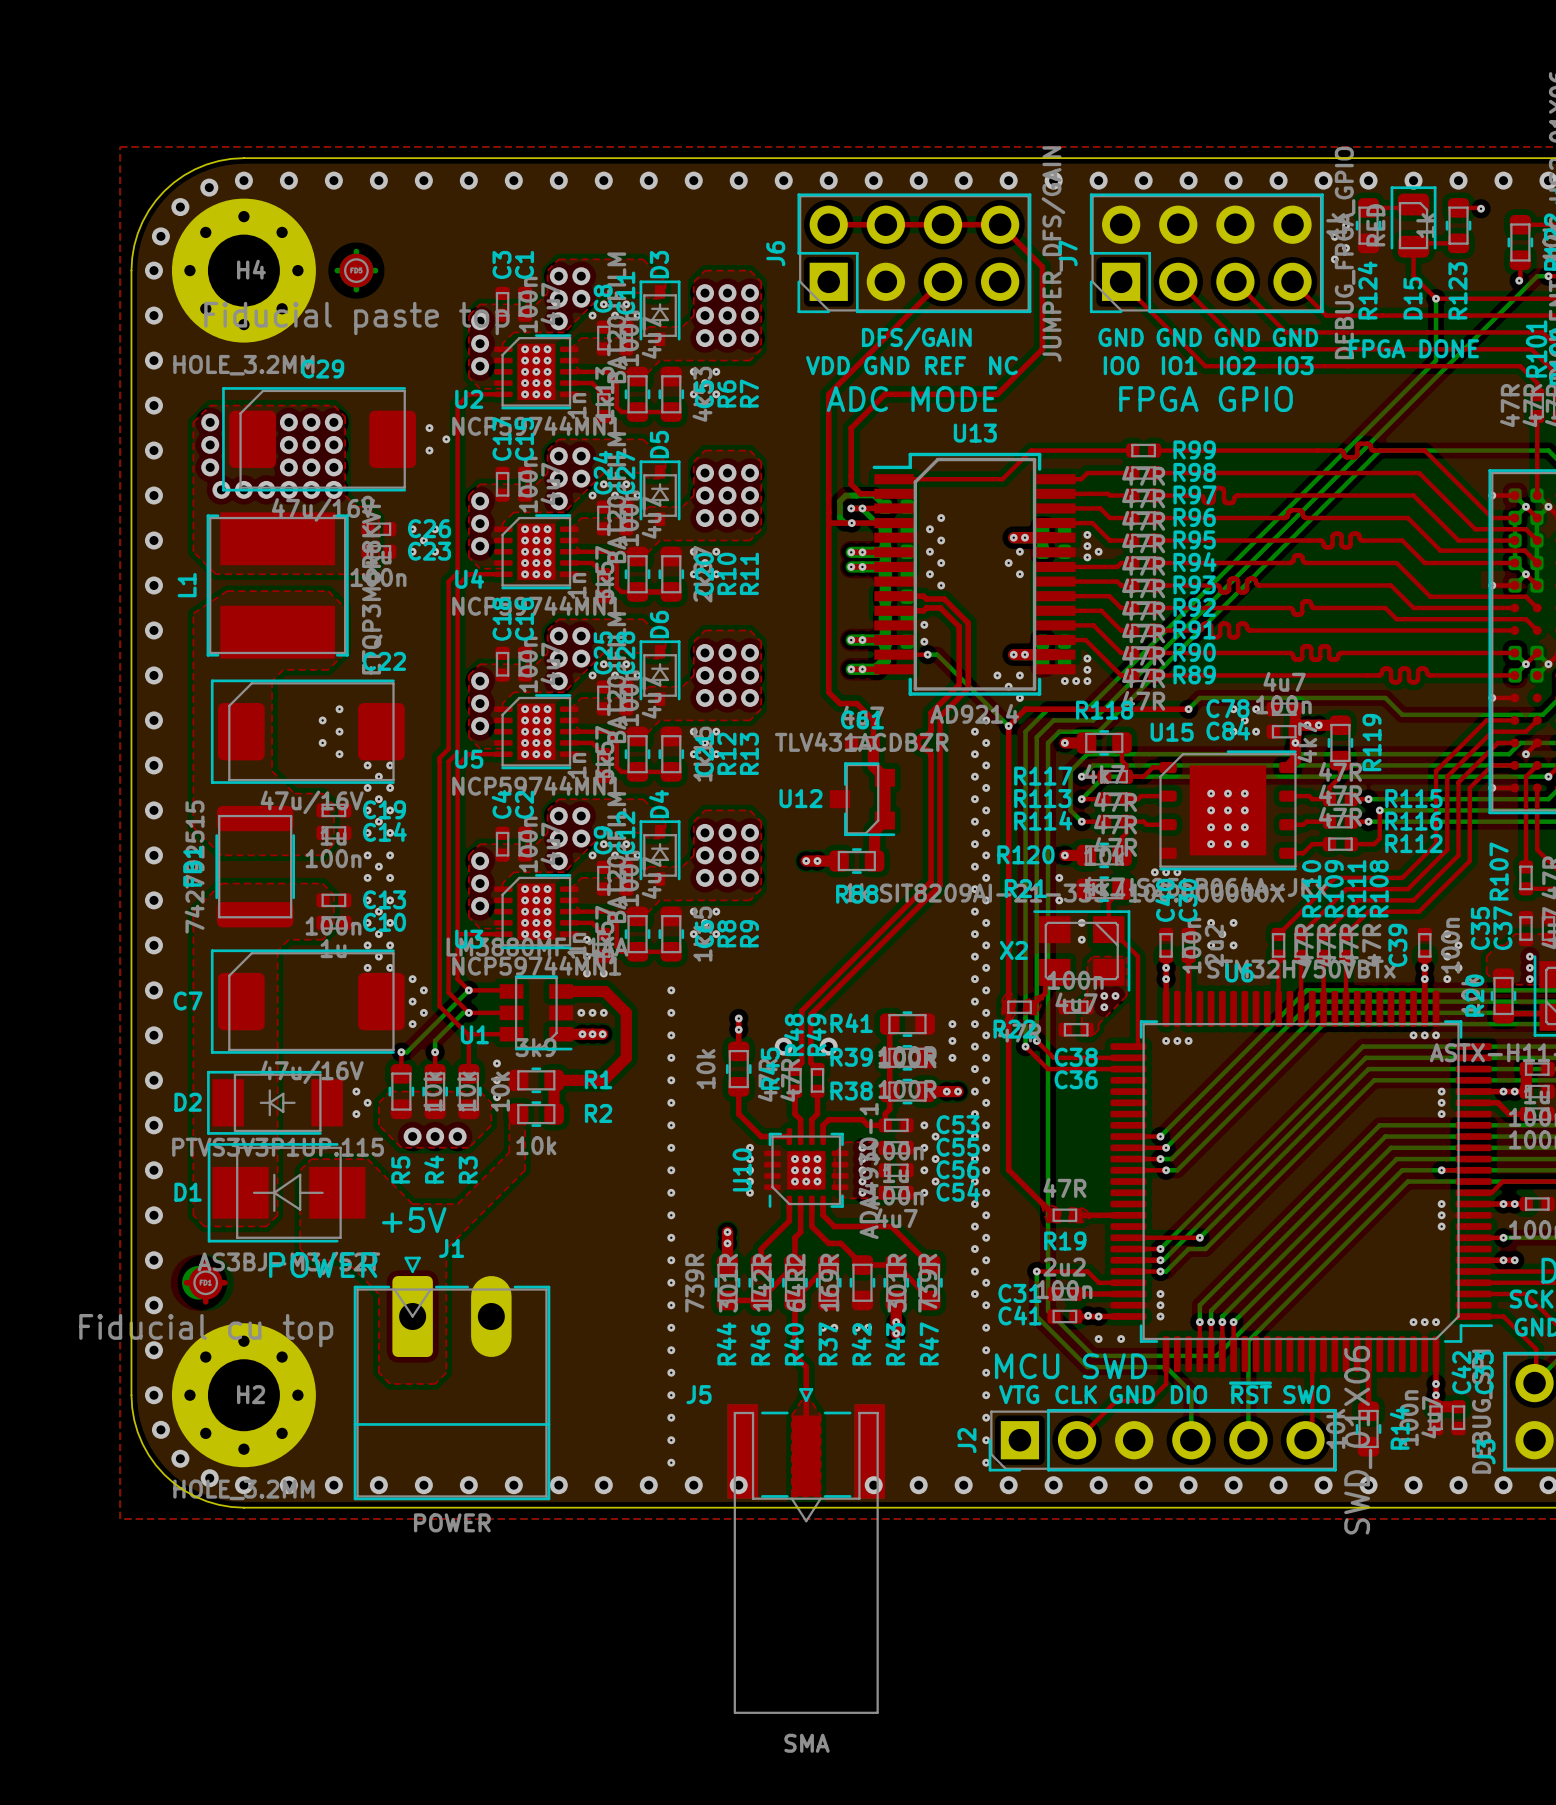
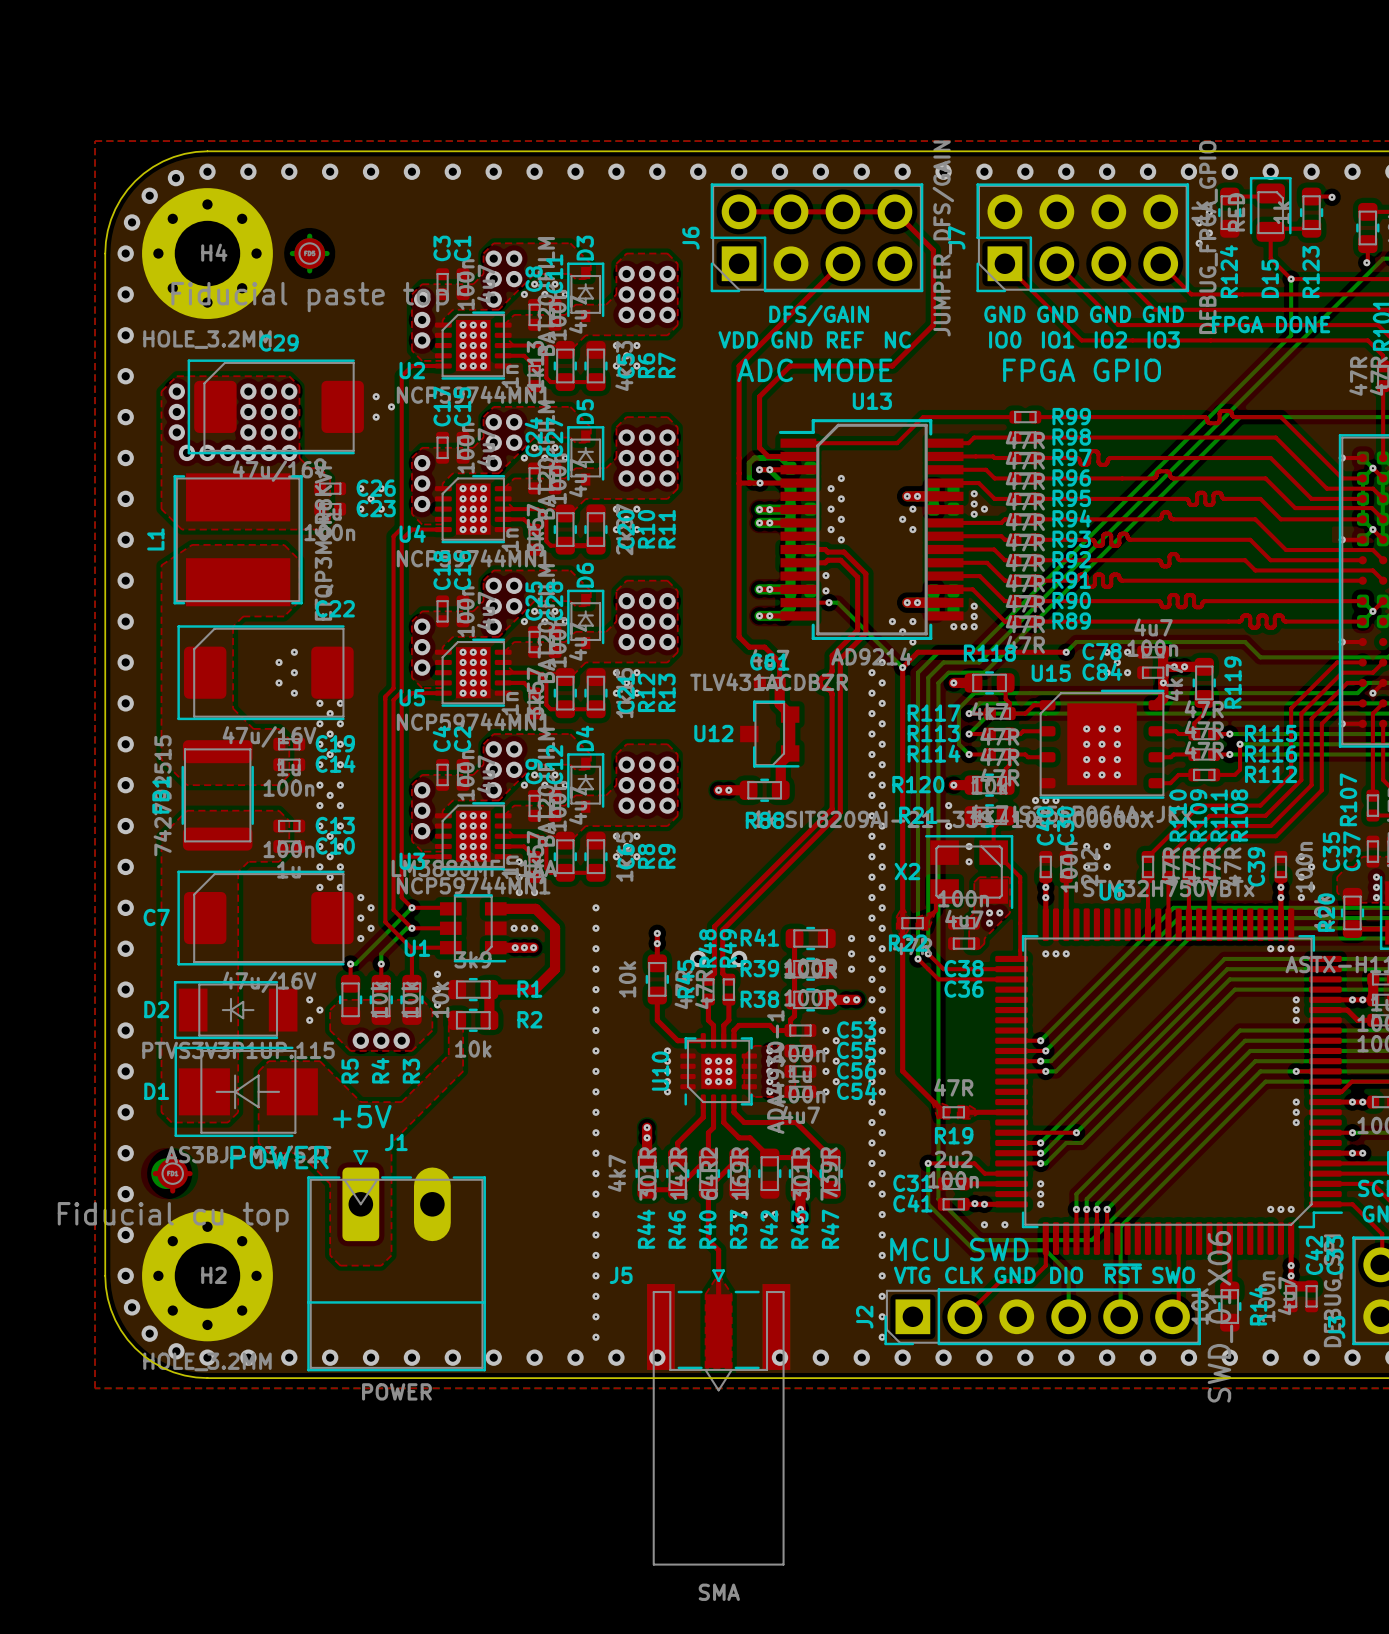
R44 value: 739R (694, 1283) -> 4k7 (616, 1173)

